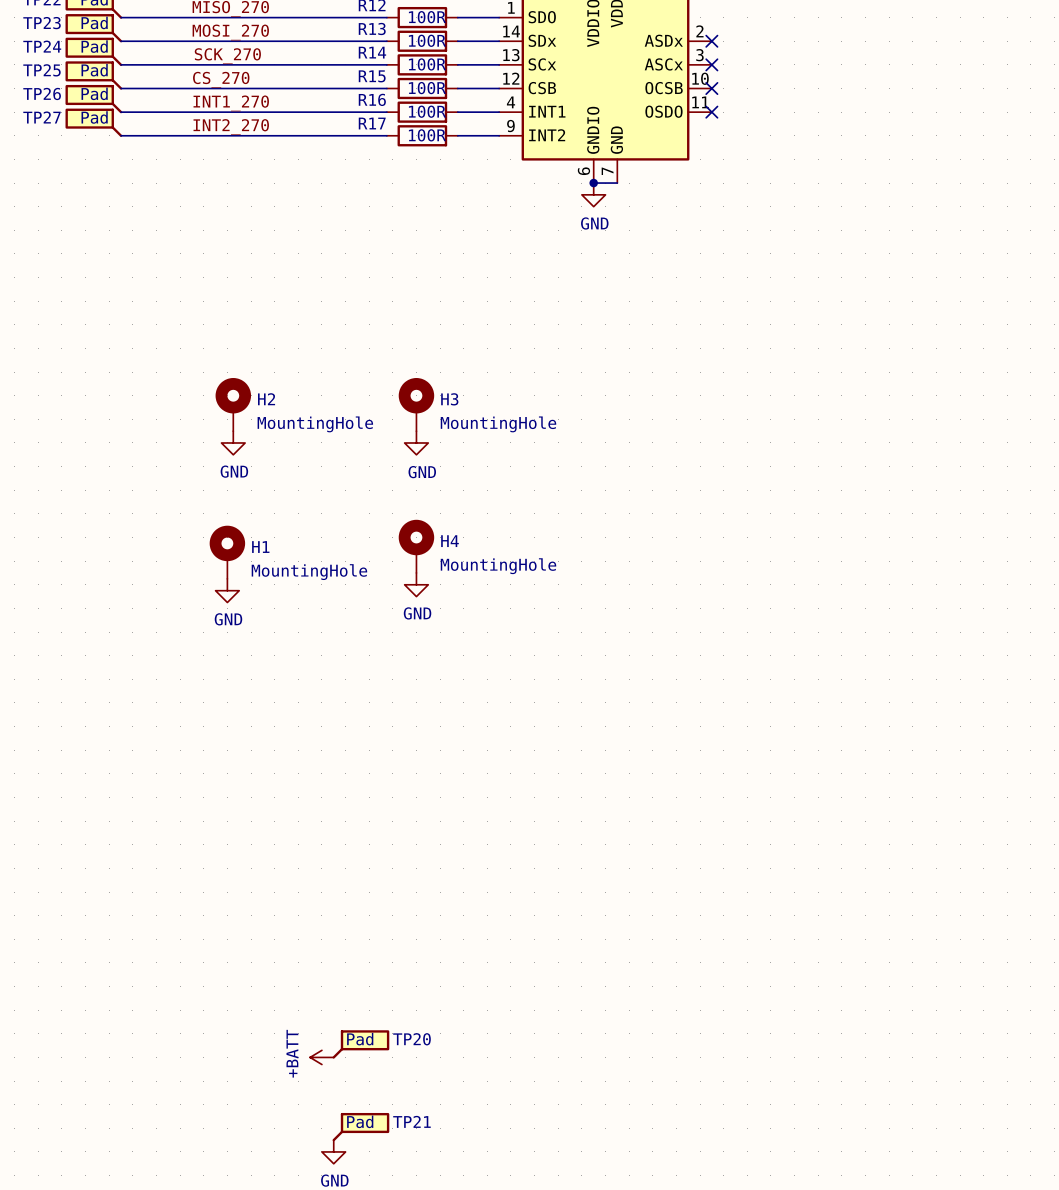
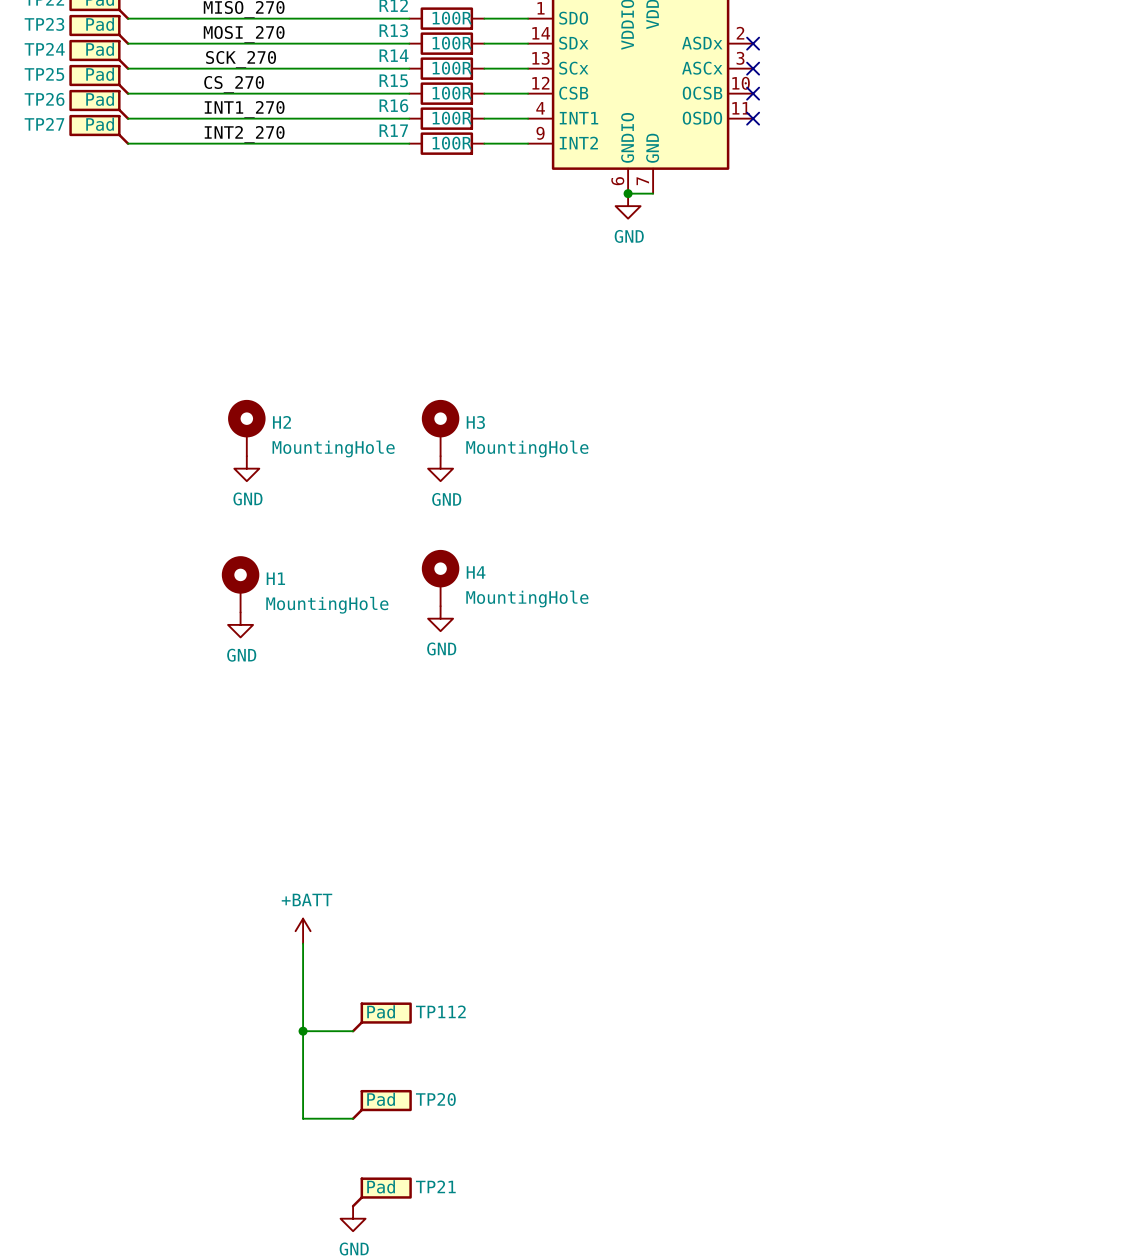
wire: none -> (303, 943) (303, 1118) (353, 1118)
TP112: none -> Pad (381, 1017)
wire: none -> (303, 1031) (353, 1031)
junction: none -> (303, 1031)
power symbol rotation: 0° (321, 1057) -> 90° clockwise (303, 931)
power symbol position: +BATT (321, 1057) -> +BATT (303, 931)

